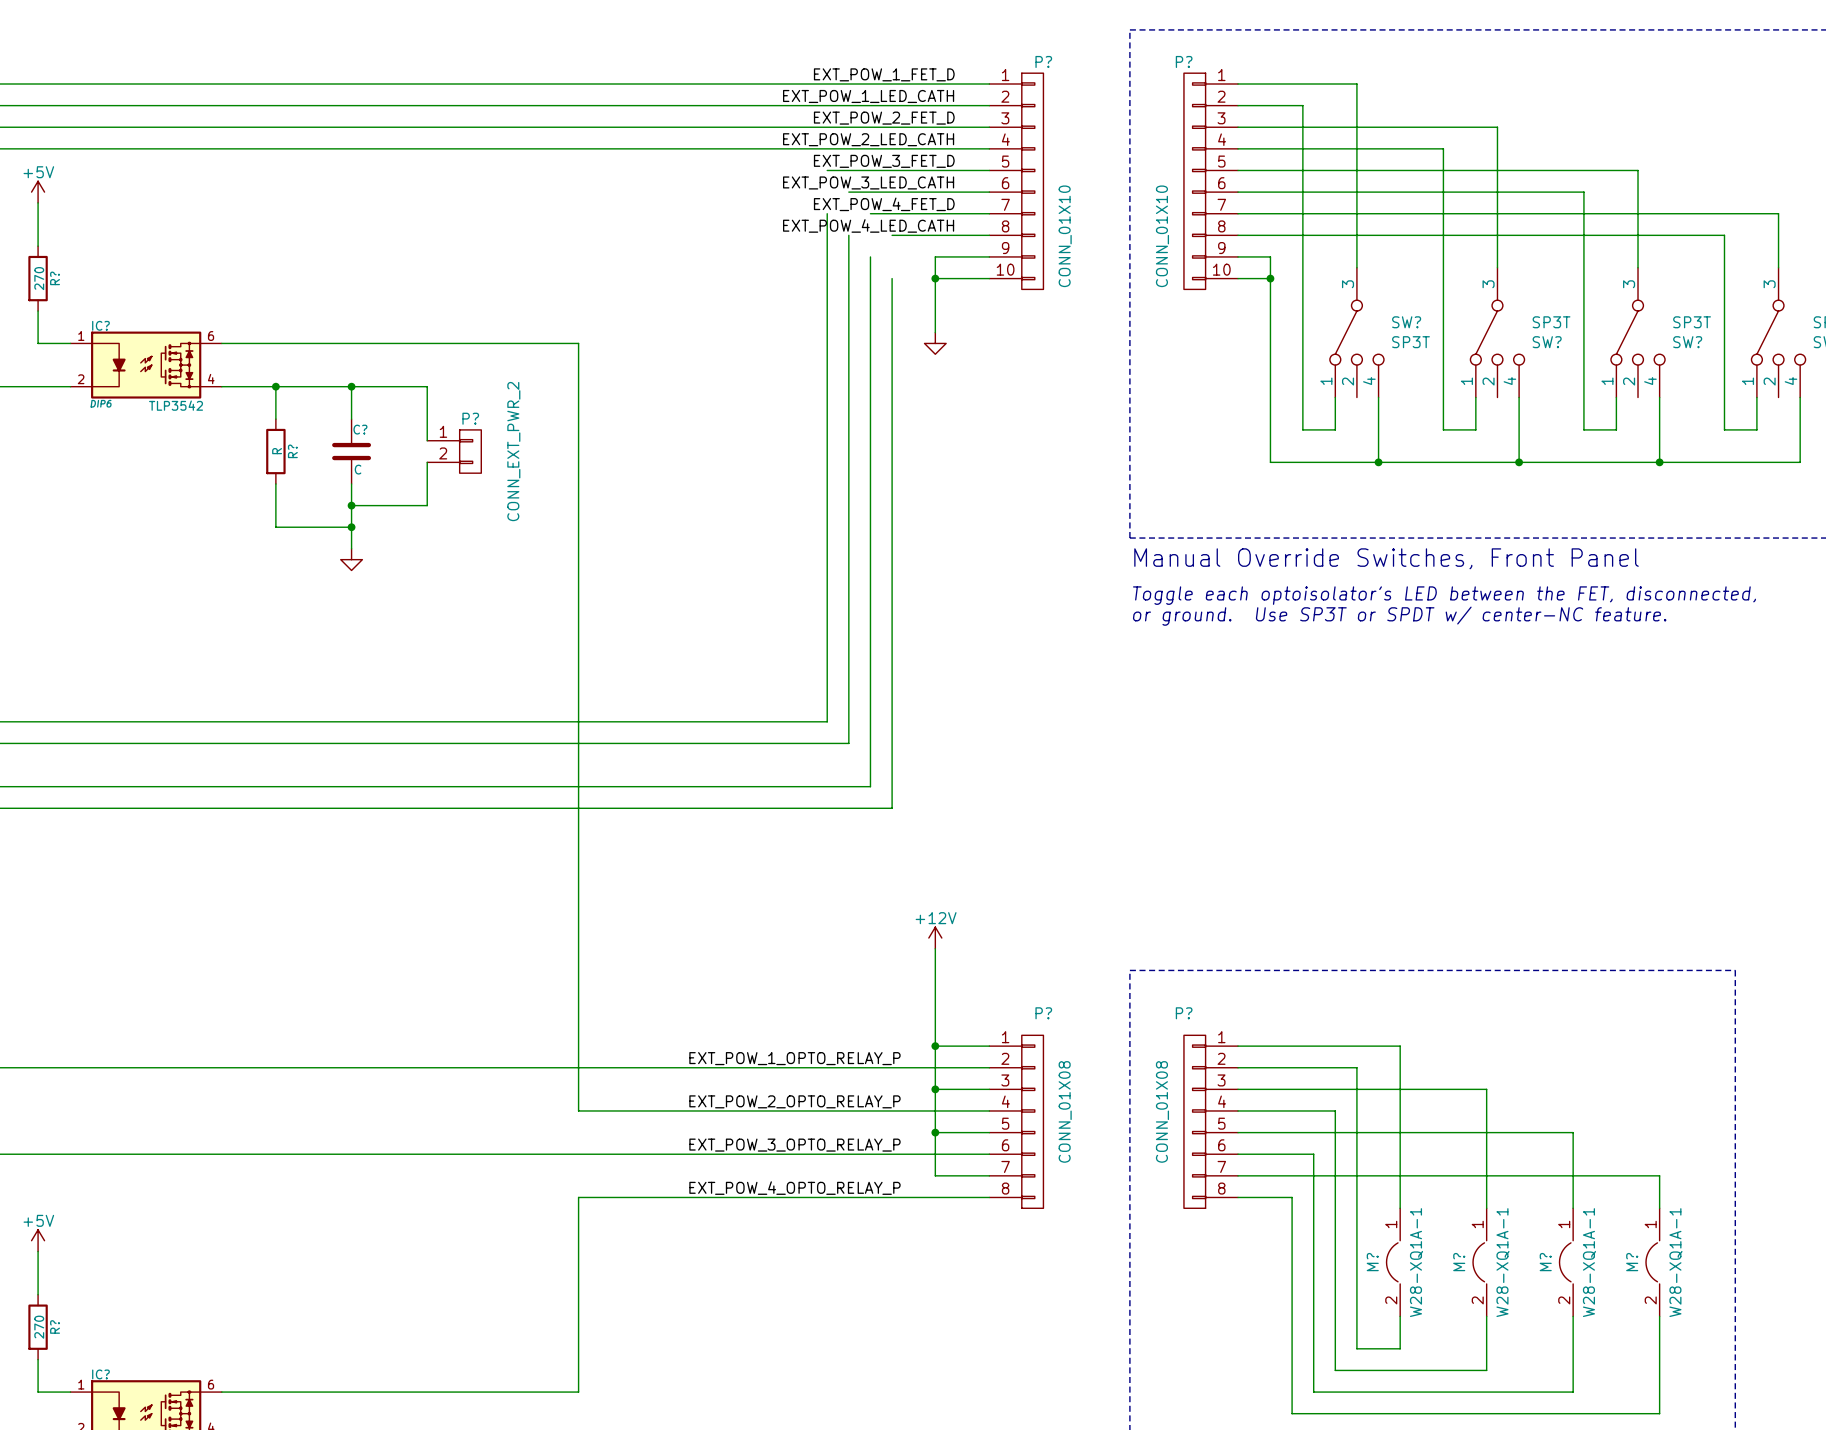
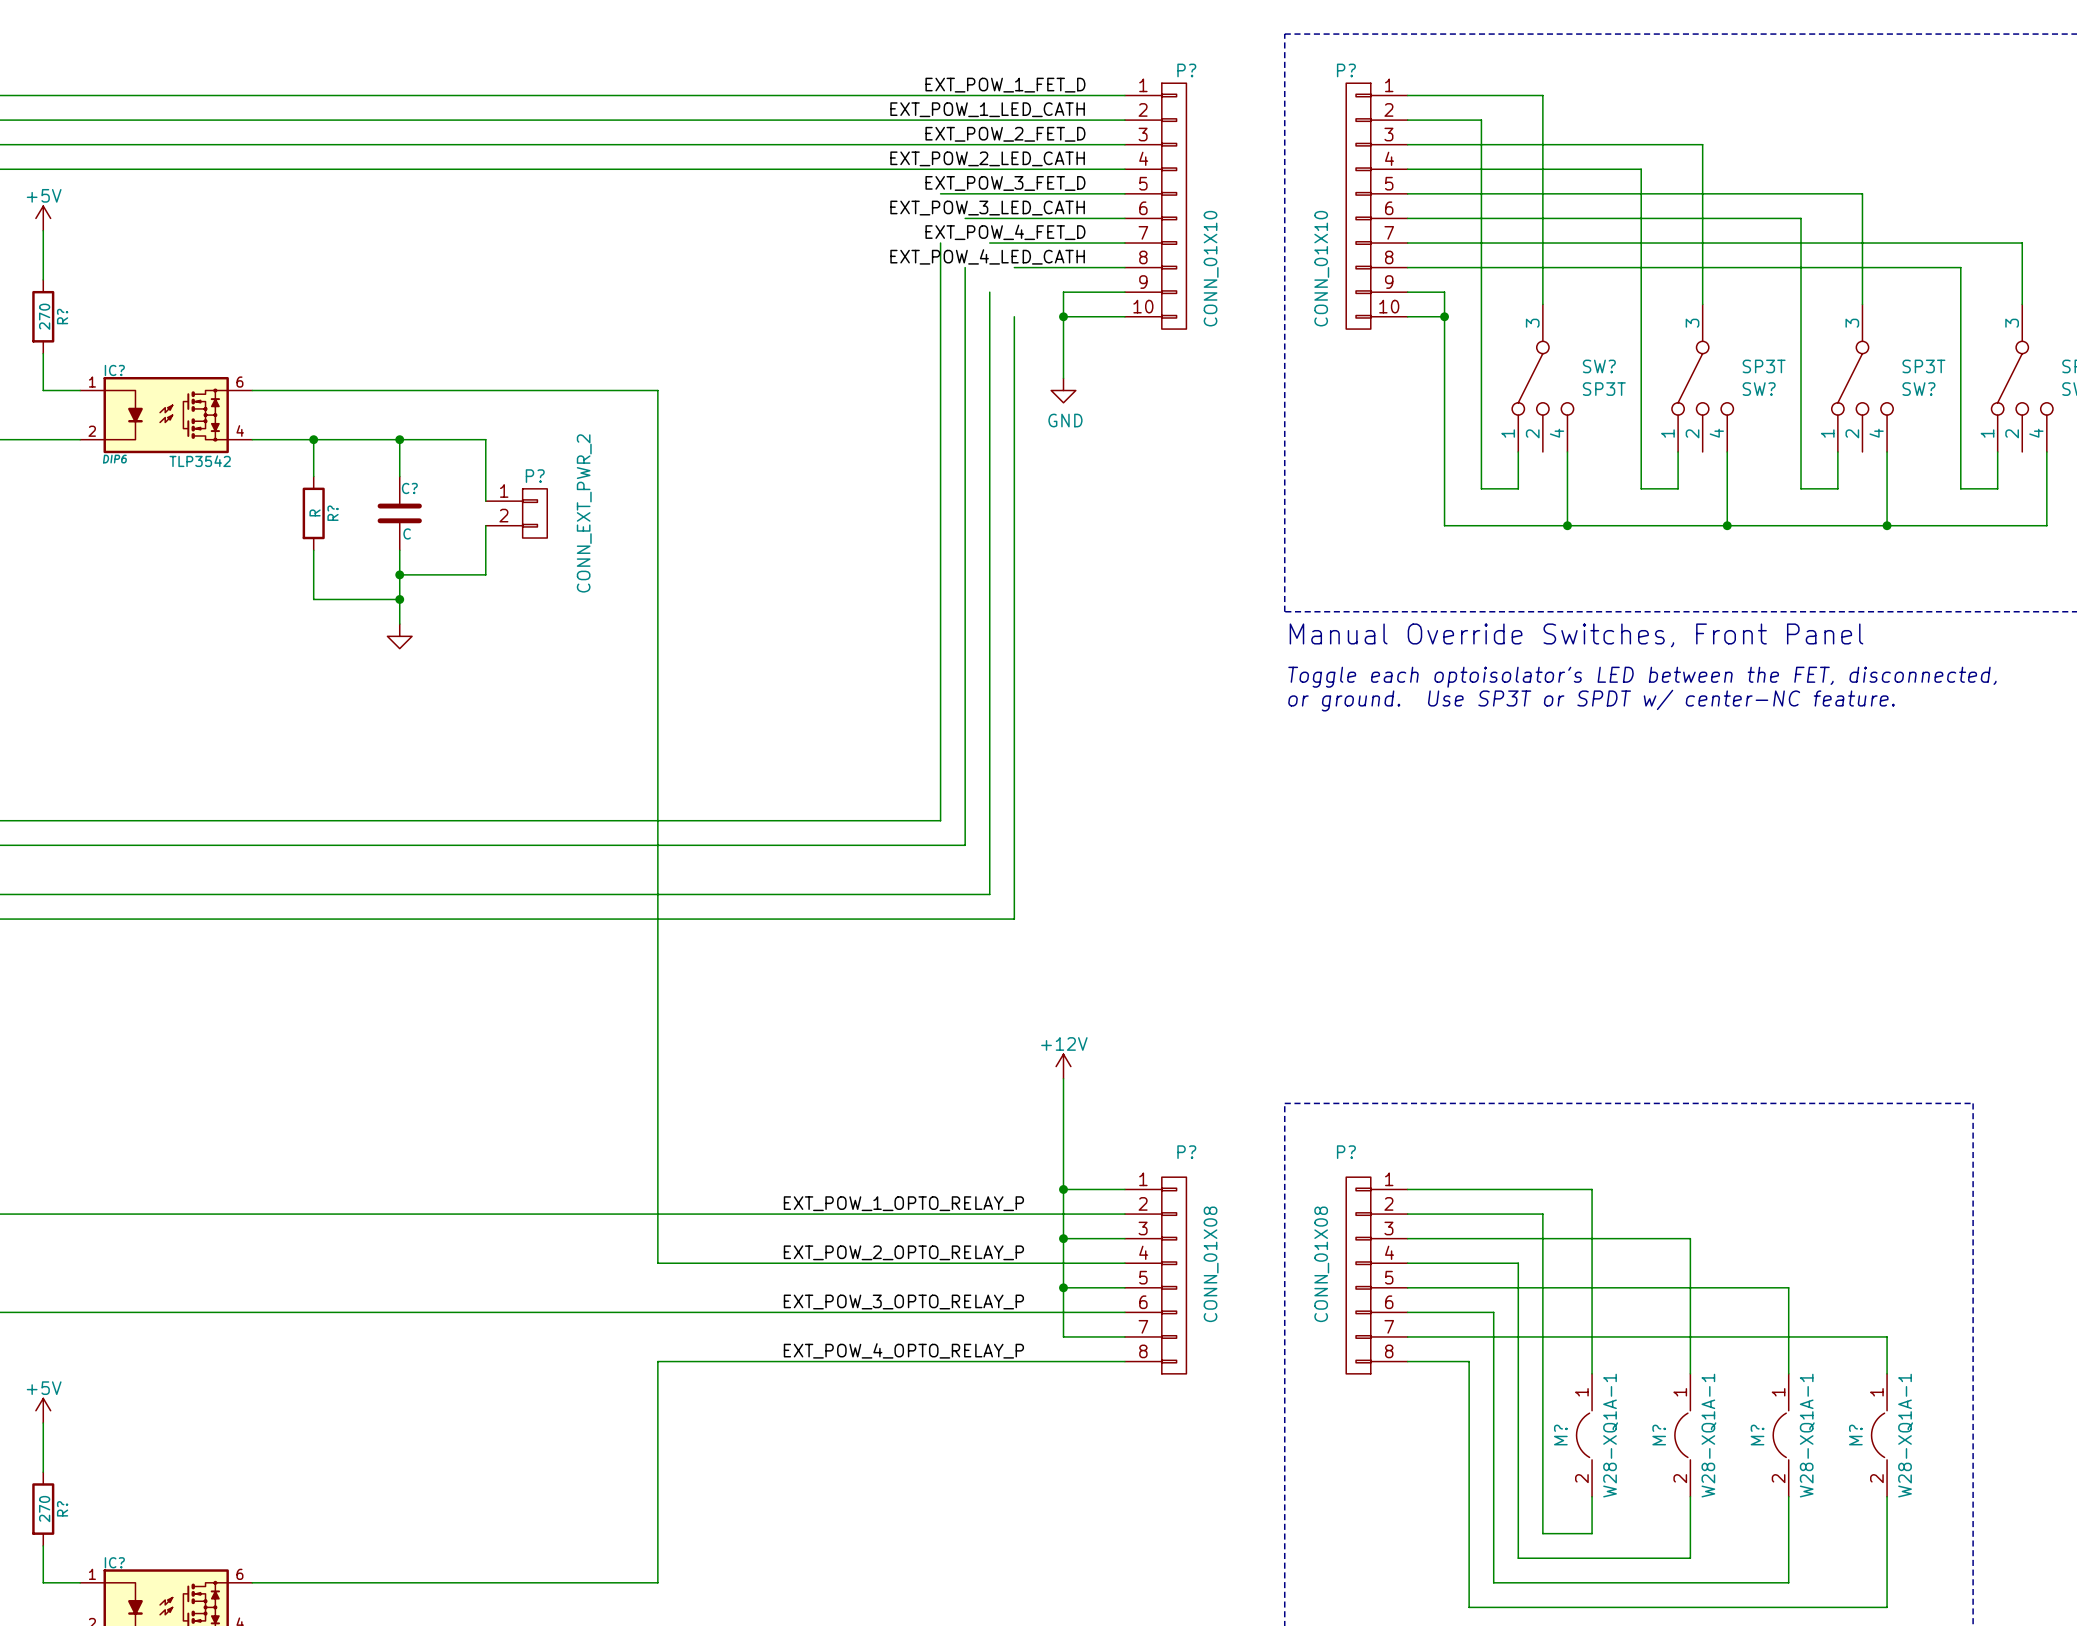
power symbol text: none -> GND (1065, 420)

